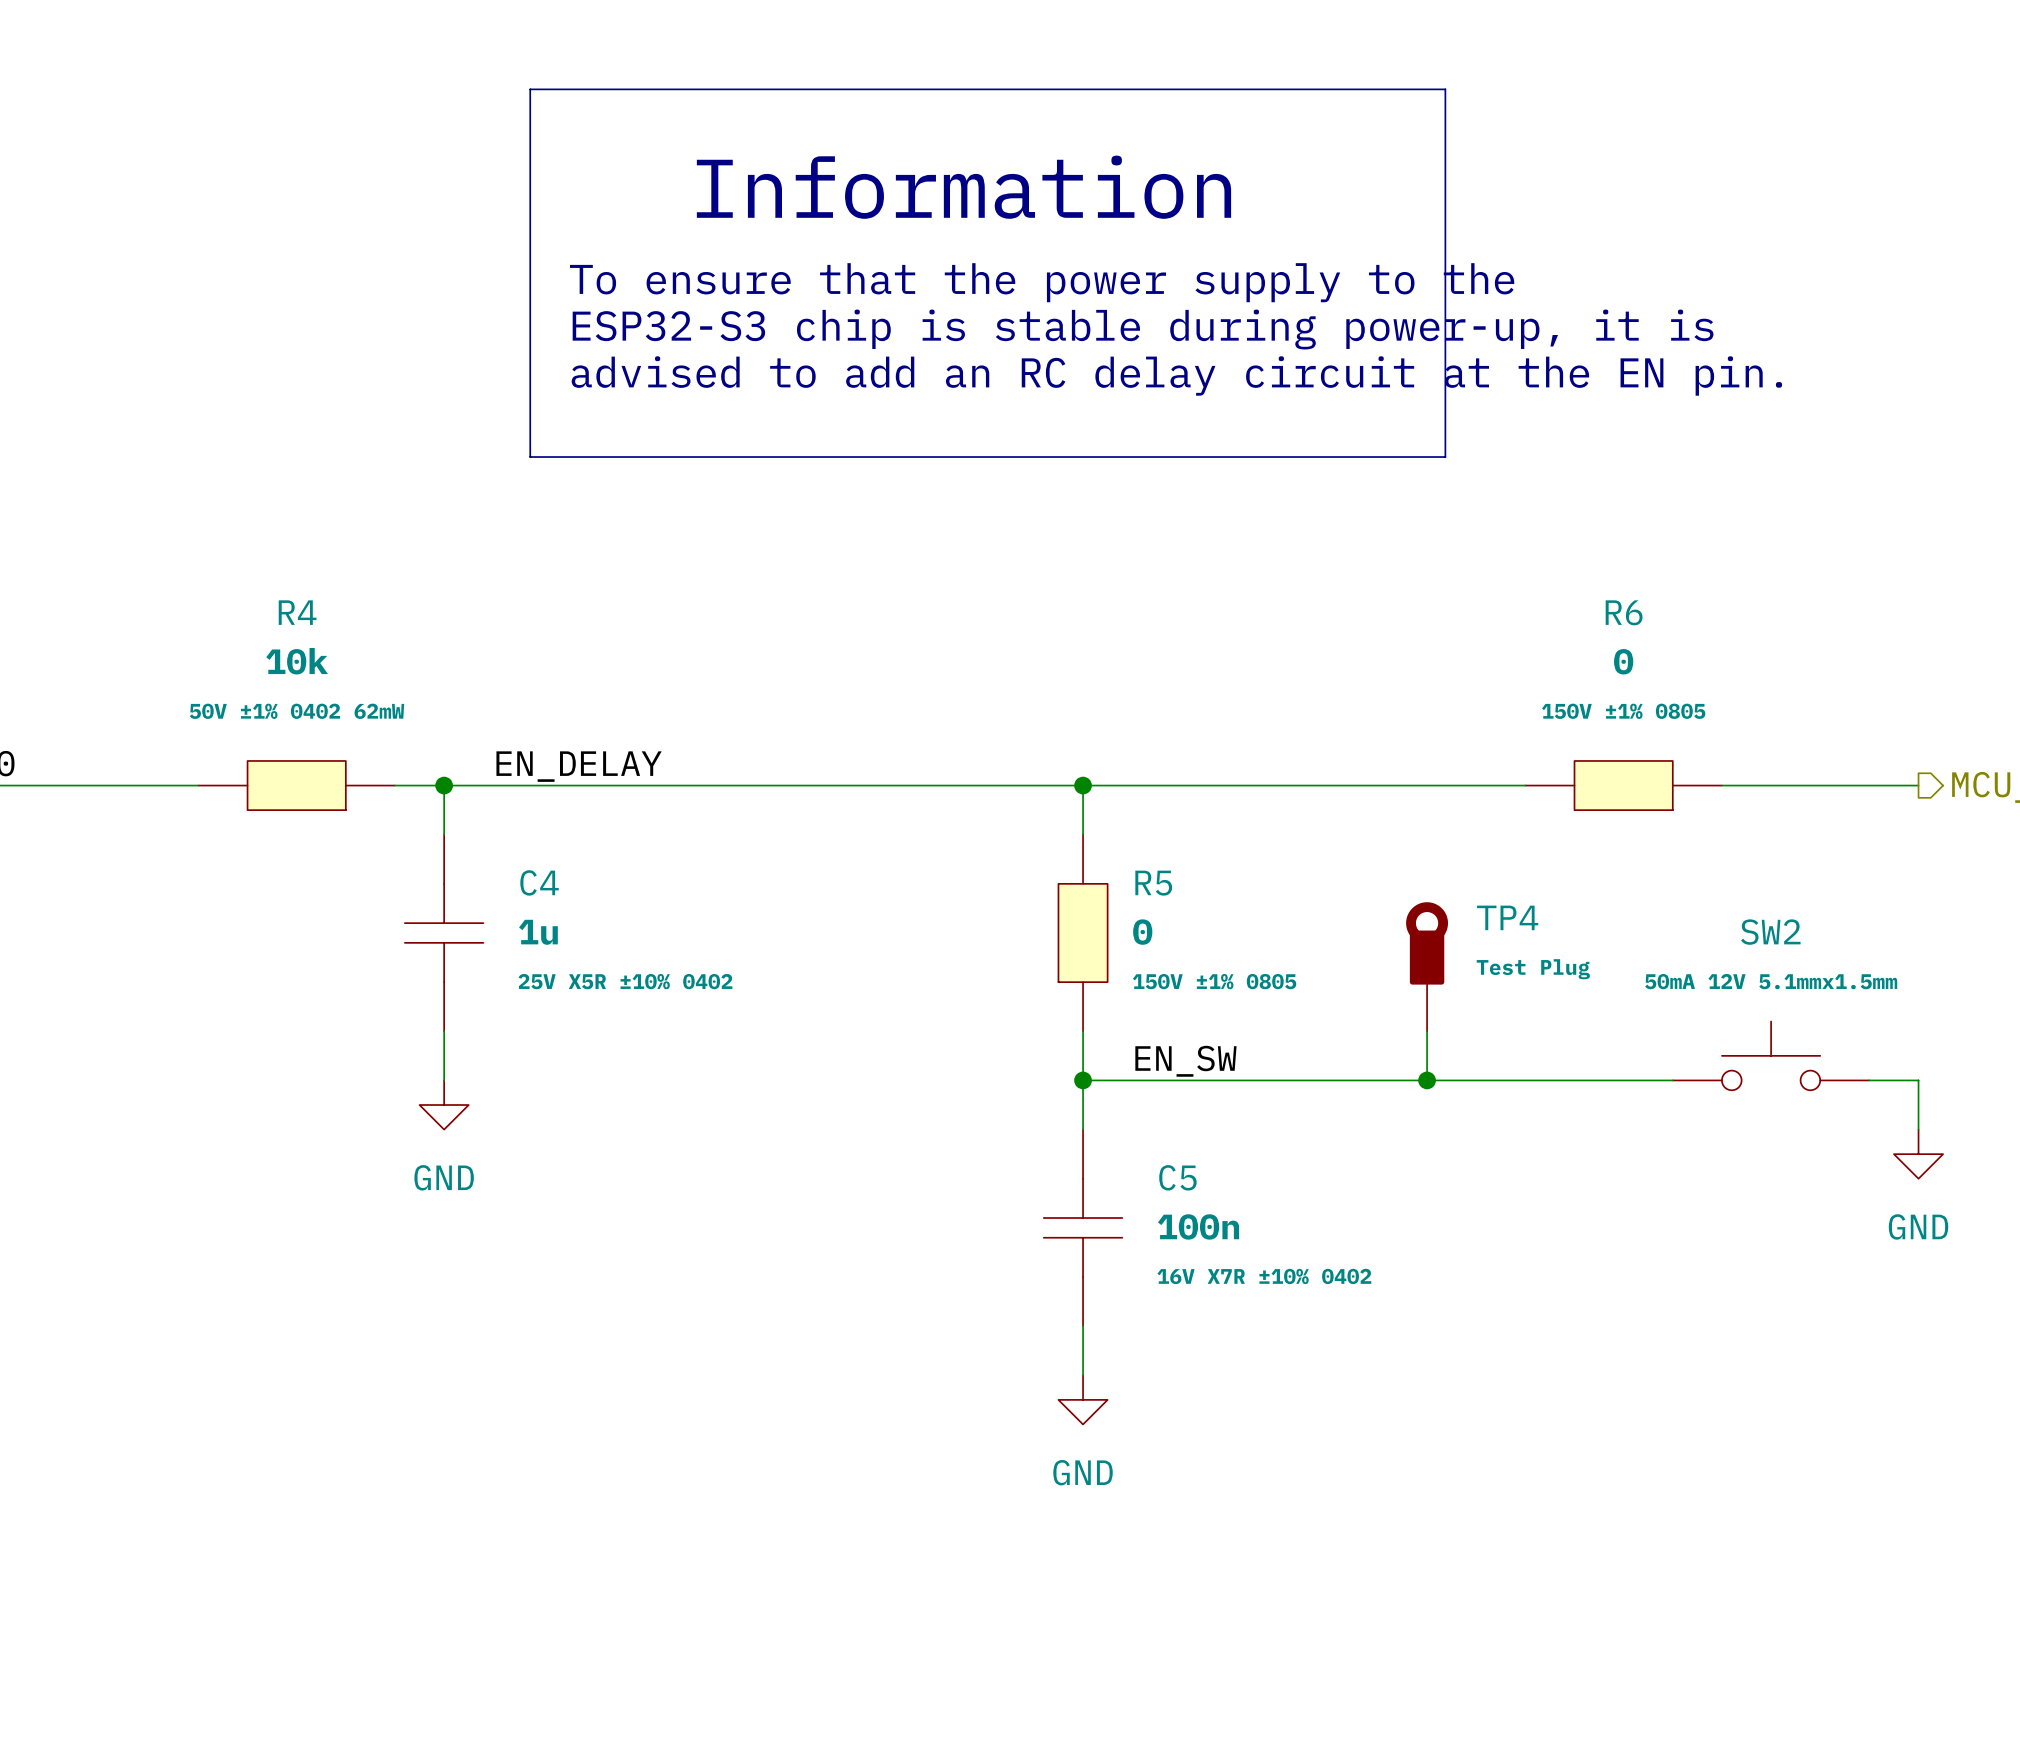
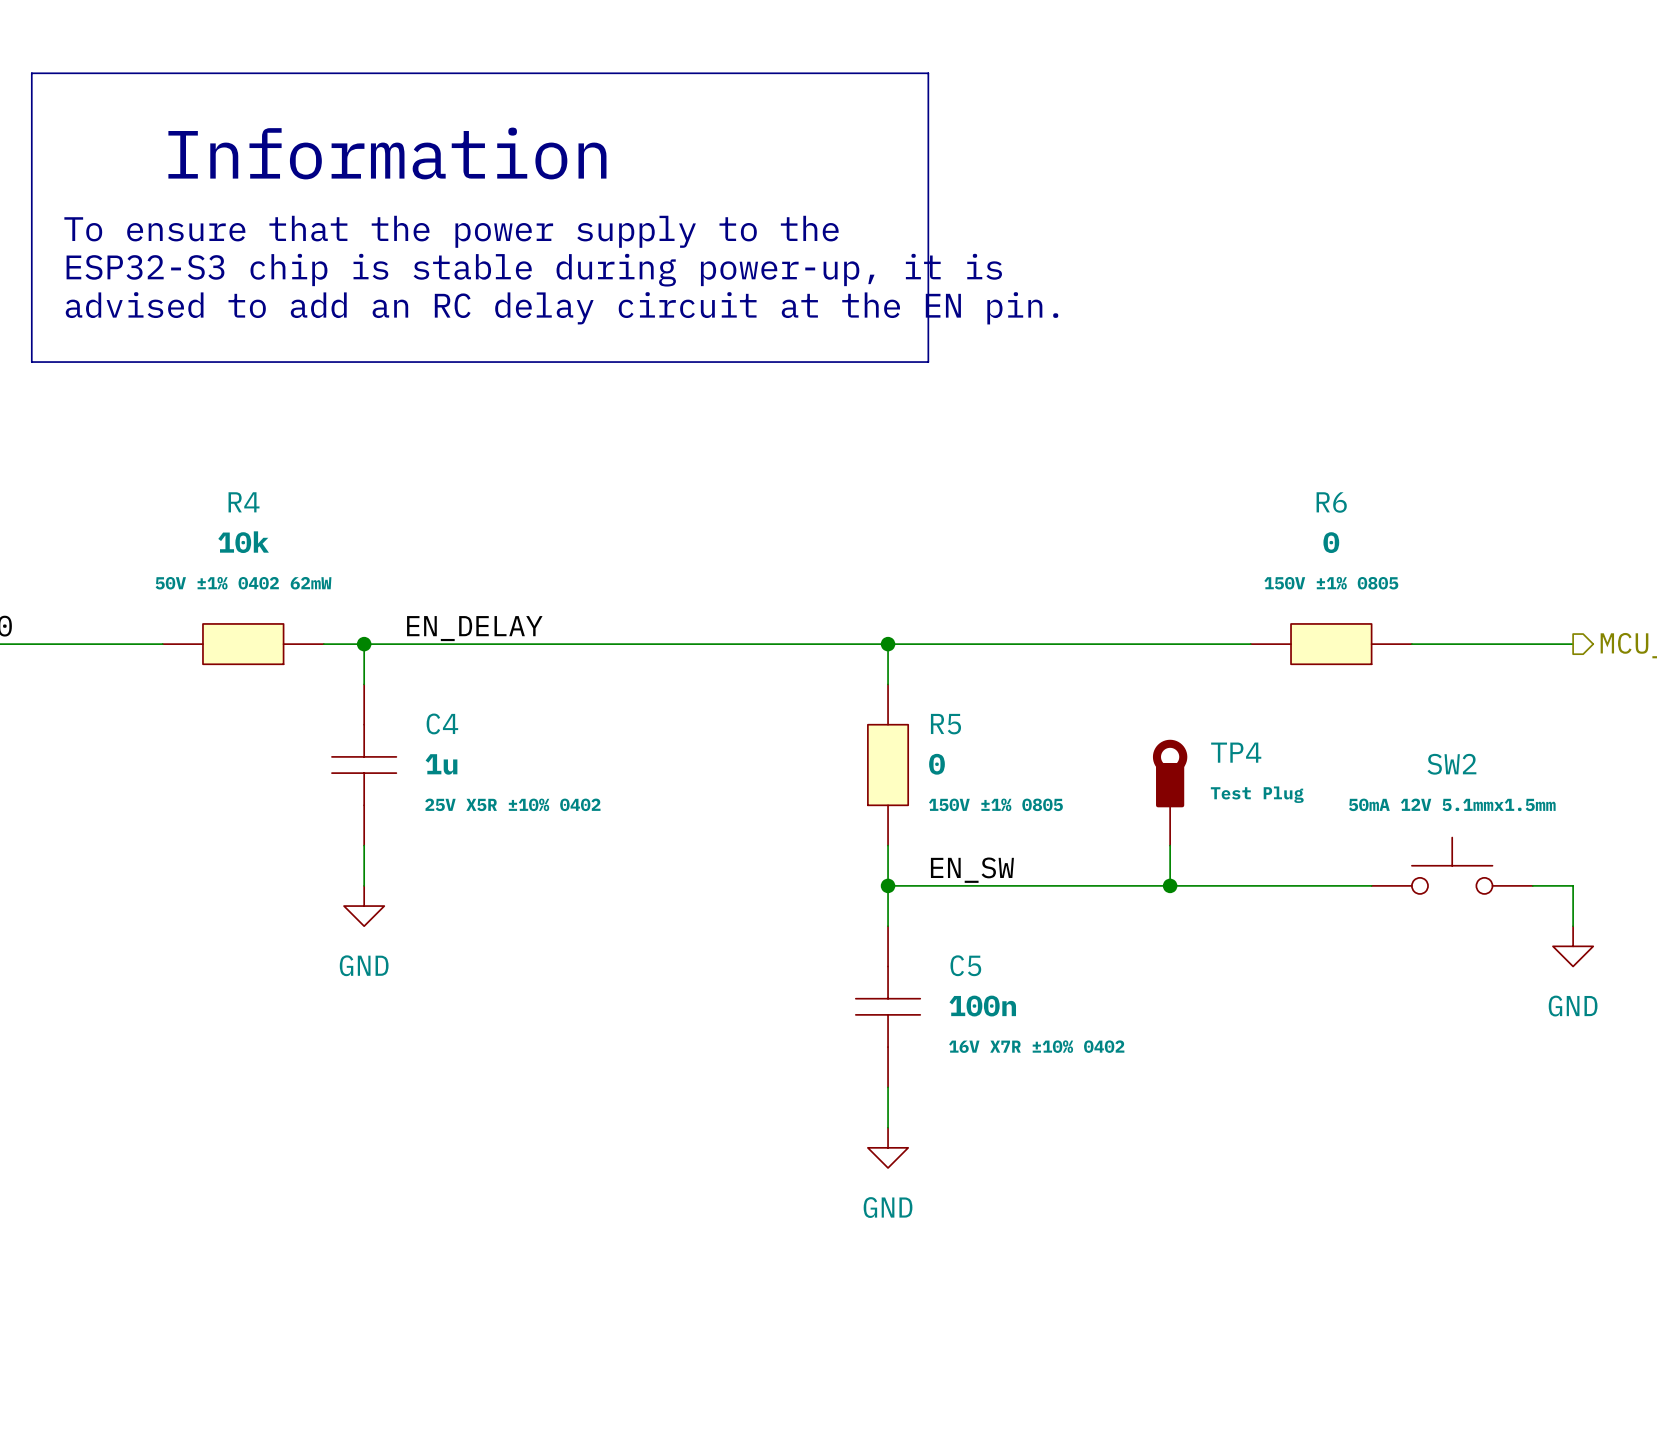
line: (530, 89) (530, 457) (1445, 457) (1445, 89) (1132, 89) -> (434, 73) (31, 73) (31, 362) (928, 362) (928, 73)
text: none -> Information (387, 153)
text: Information (963, 187) -> none
text: none -> To ensure that the power supply to the (451, 231)
text: To ensure that the power supply to the (1042, 282) -> none
text: none -> ESP32-S3 chip is stable during power-up, it is (534, 270)
text: ESP32-S3 chip is stable during power-up, it is (1143, 329) -> none
text: none -> advised to add an RC delay circuit at the EN pin. (562, 308)
text: advised to add an RC delay circuit at the EN pin. (1176, 375) -> none

